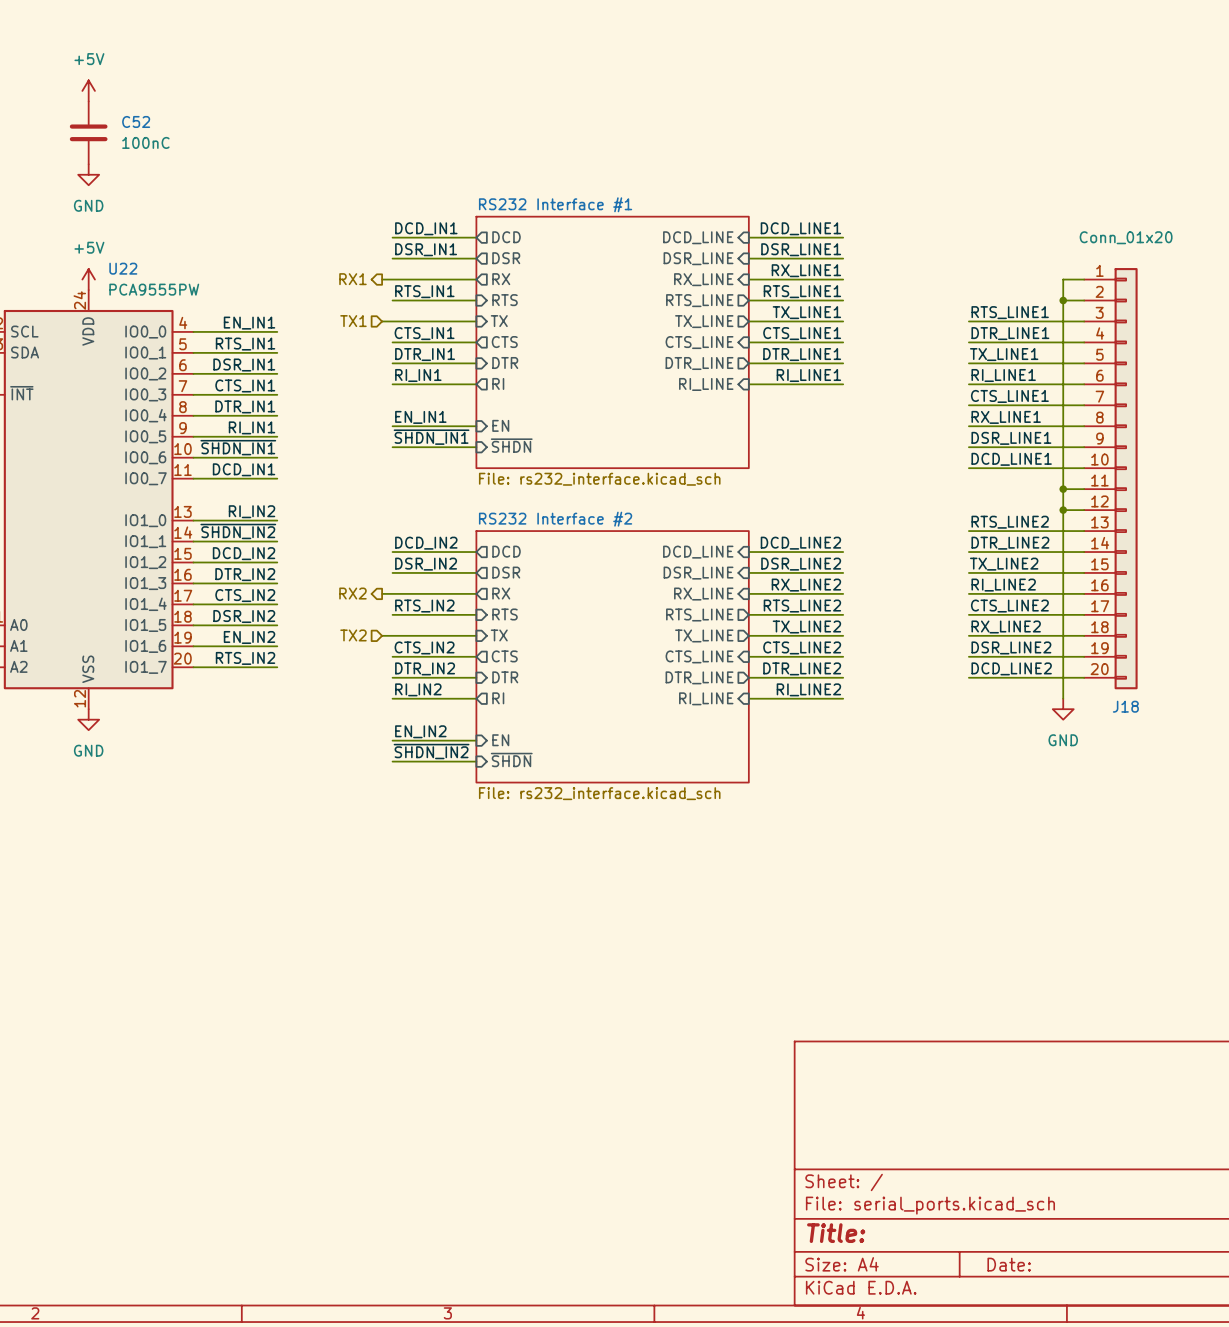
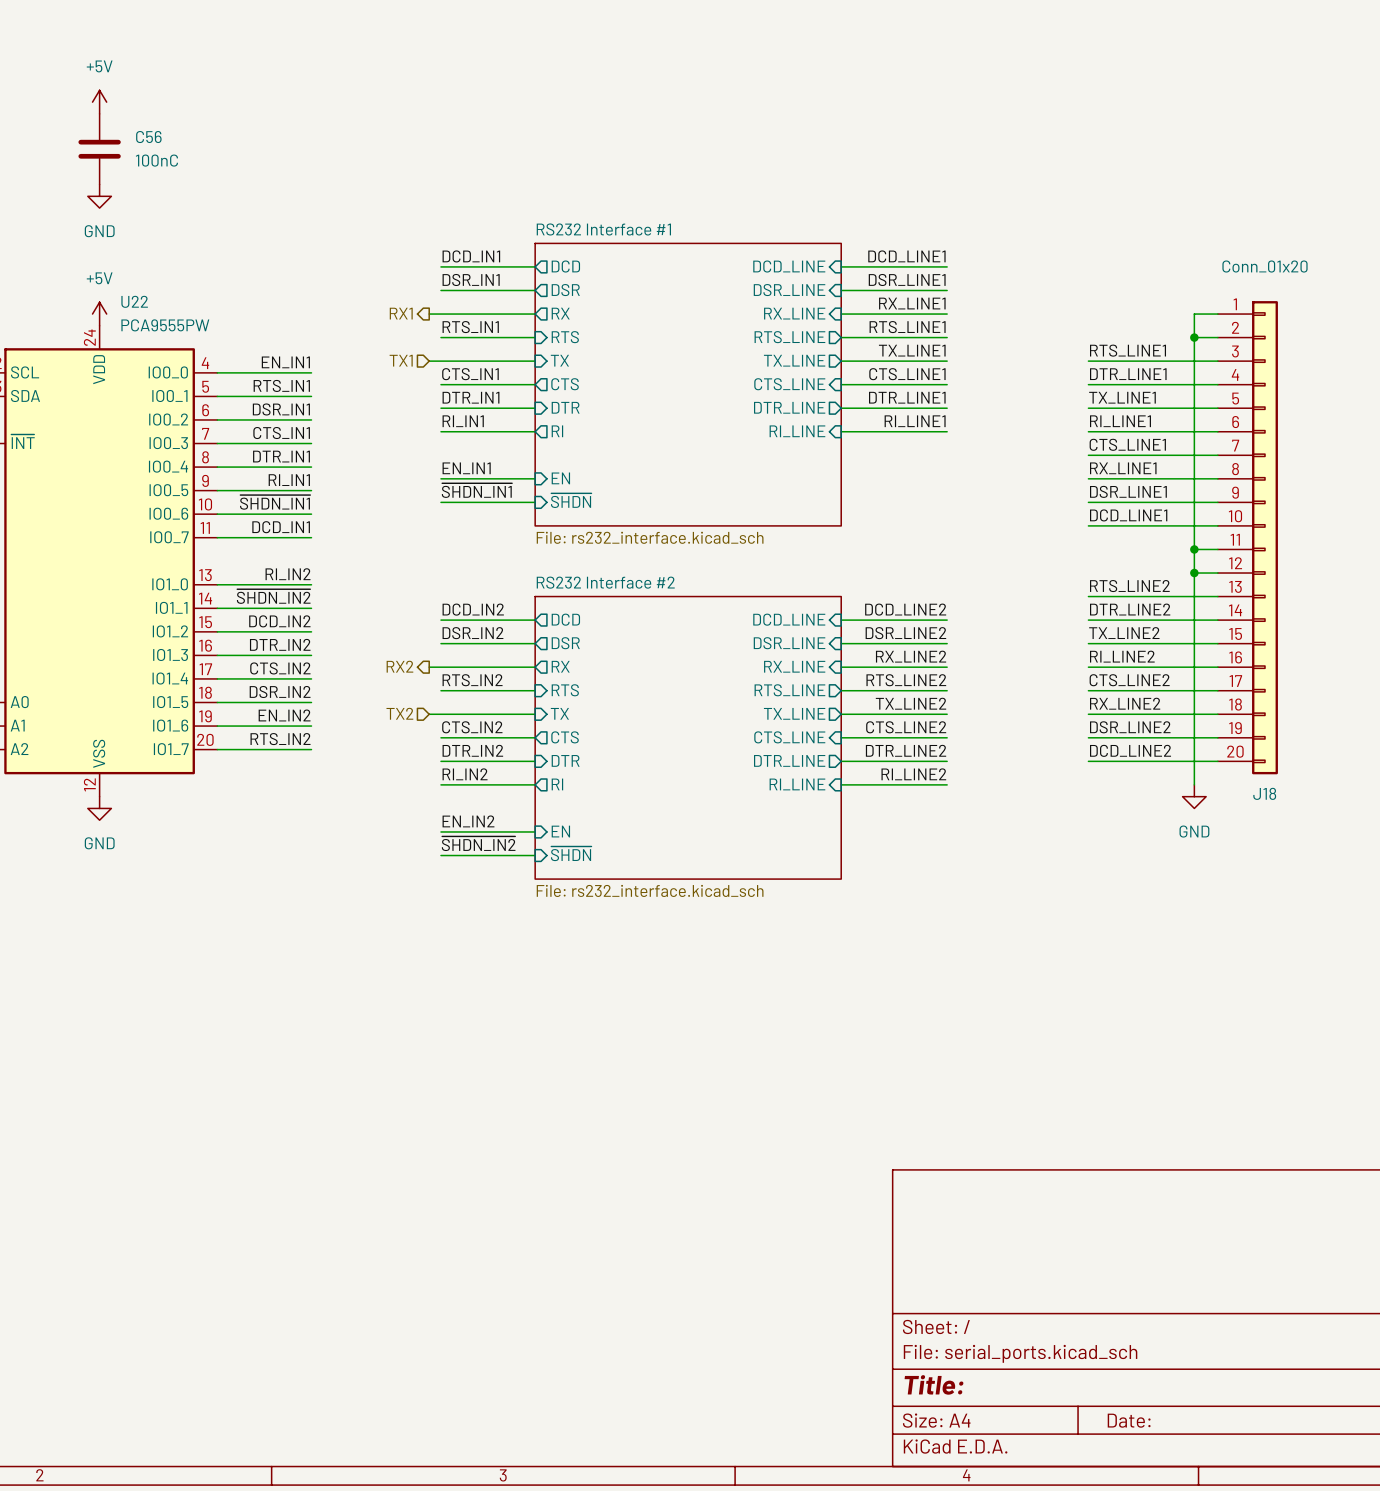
C52 name: C52 (136, 121) -> C56 (148, 137)

